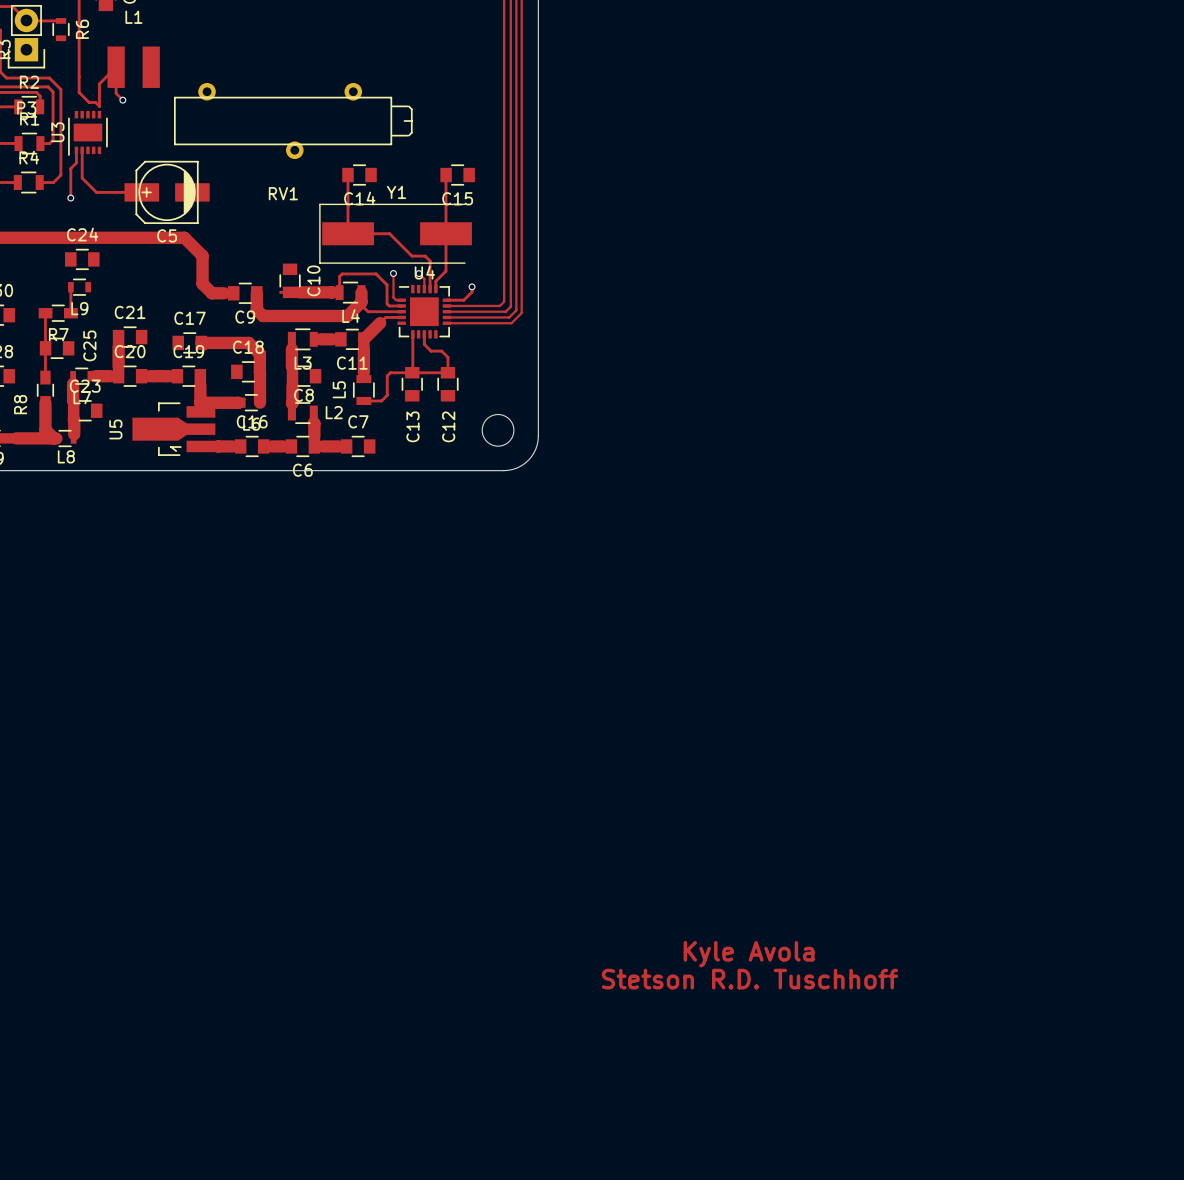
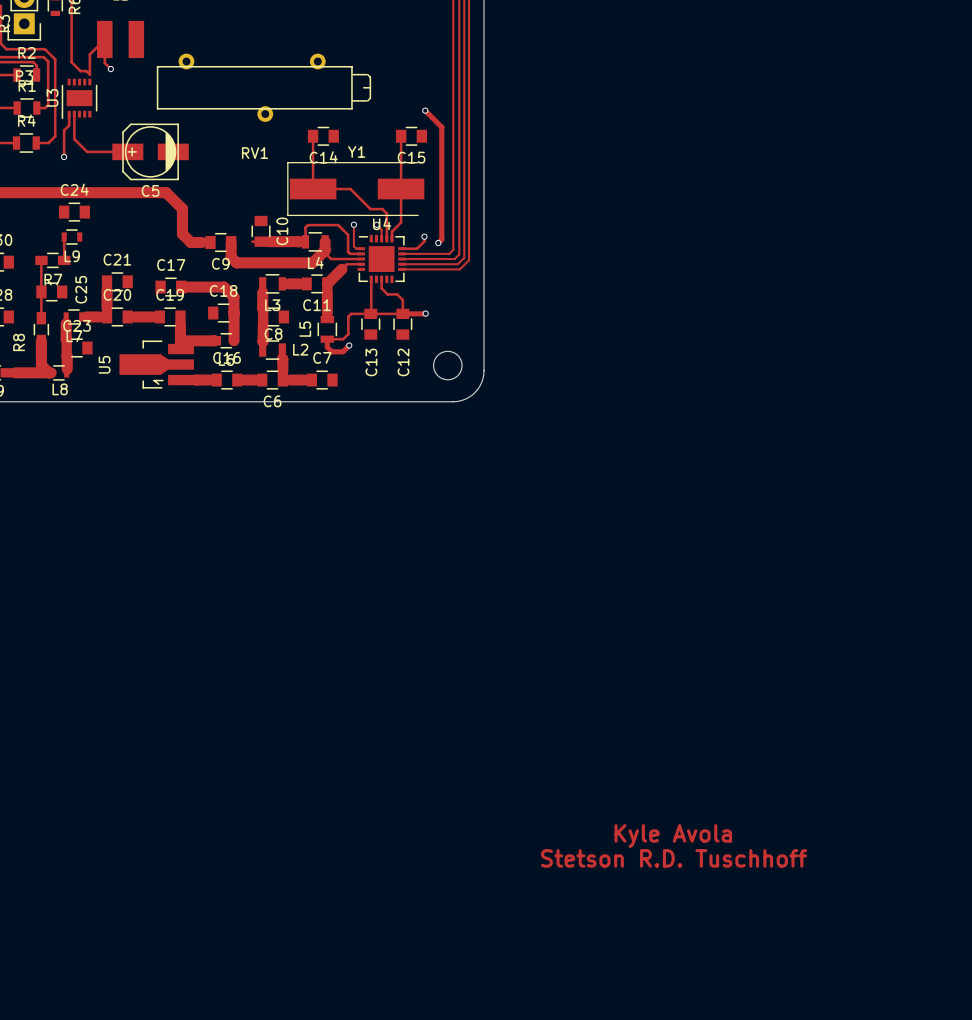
track: none -> (425, 110) (441, 127) (441, 239) (438, 243)
via: none -> (425, 110)
via: none -> (438, 243)
track: none -> (425, 313) (402, 313)
via: none -> (425, 313)
track: none -> (327, 339) (327, 347) (331, 351) (342, 351) (349, 345)
via: none -> (349, 345)

